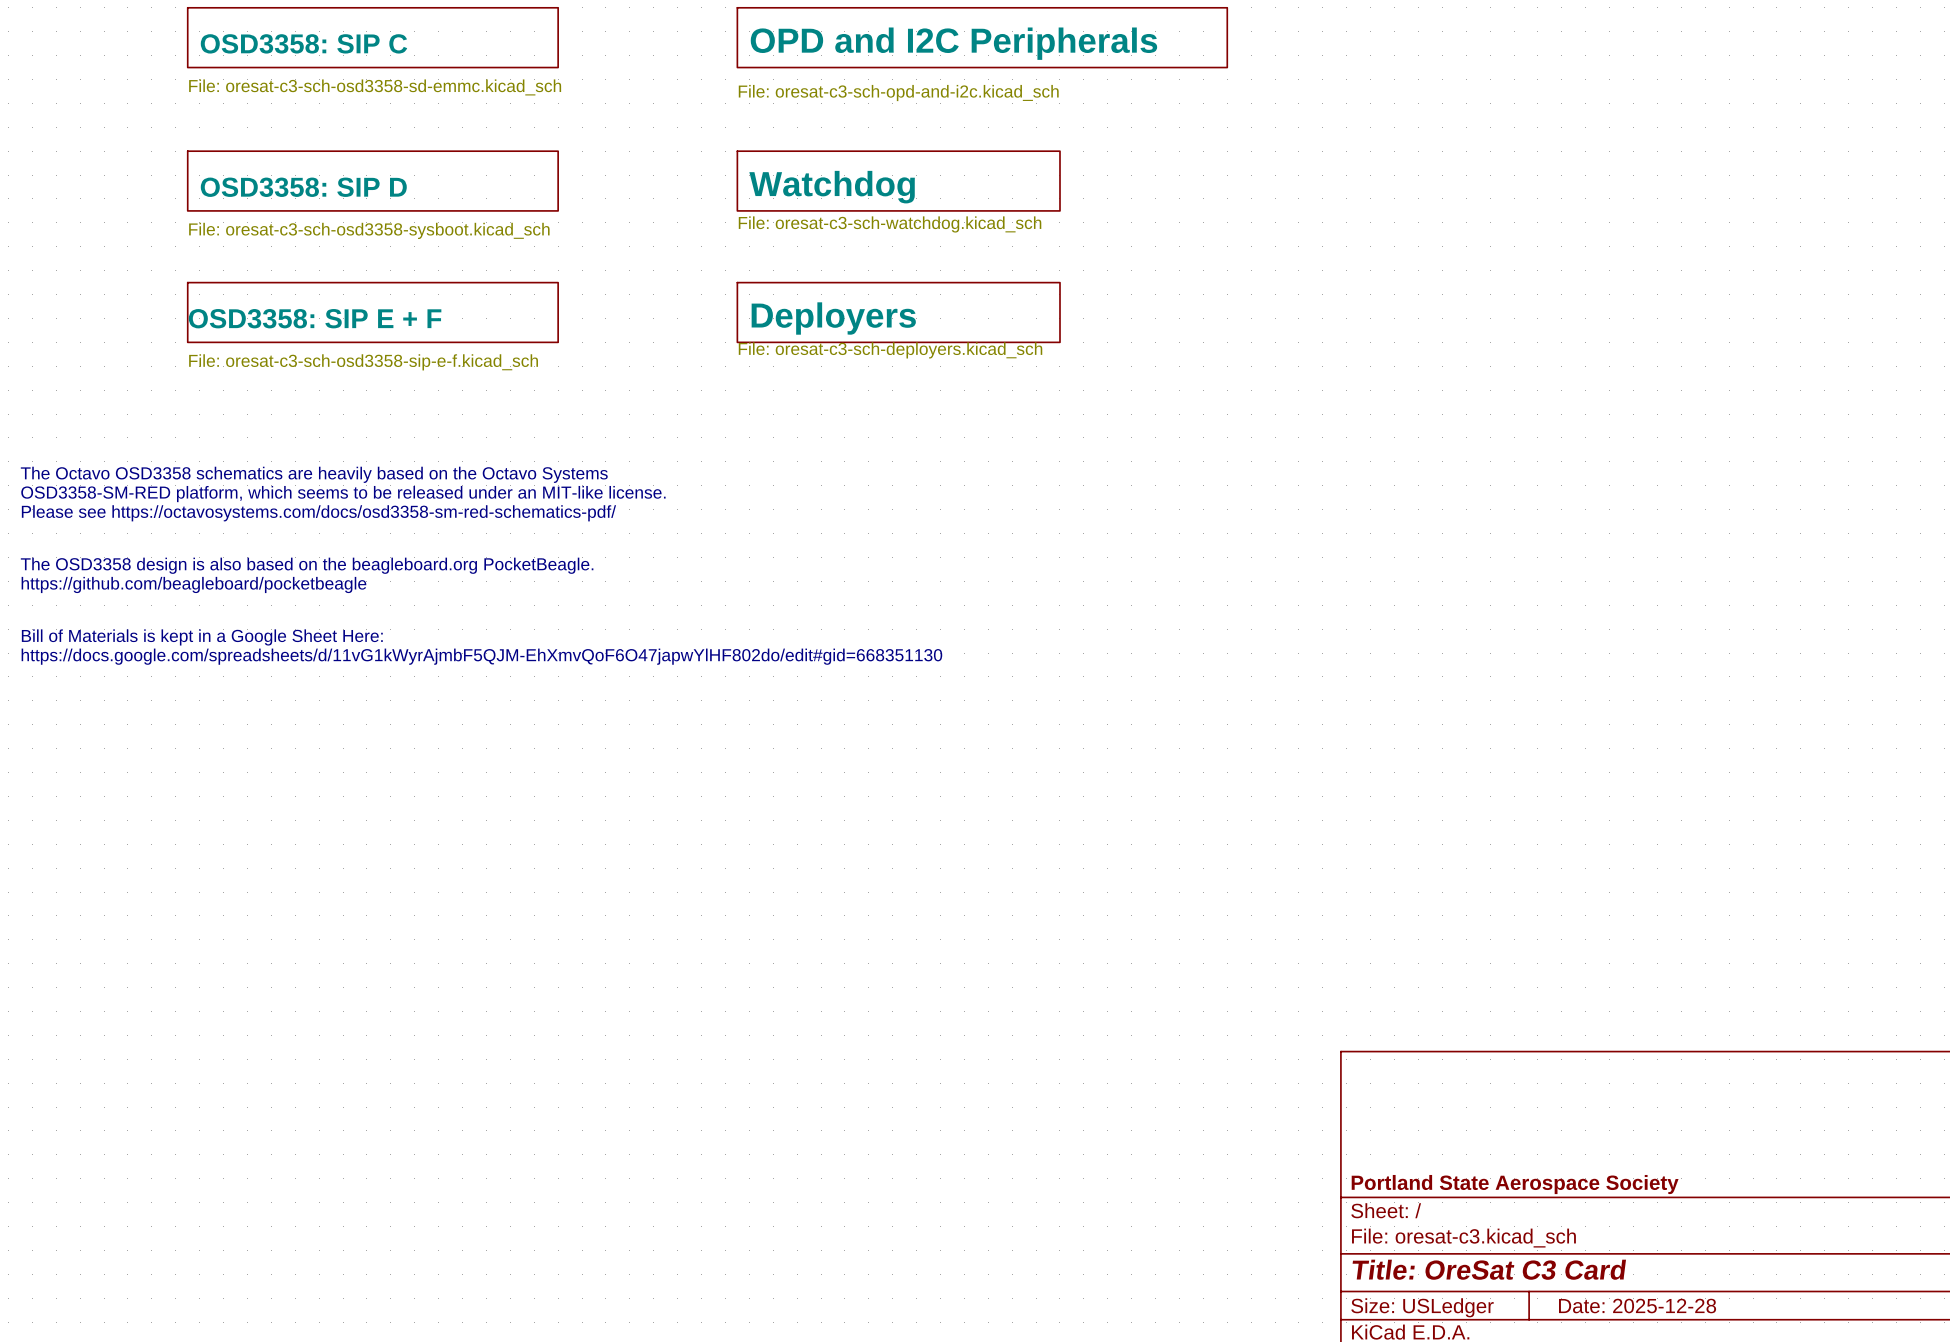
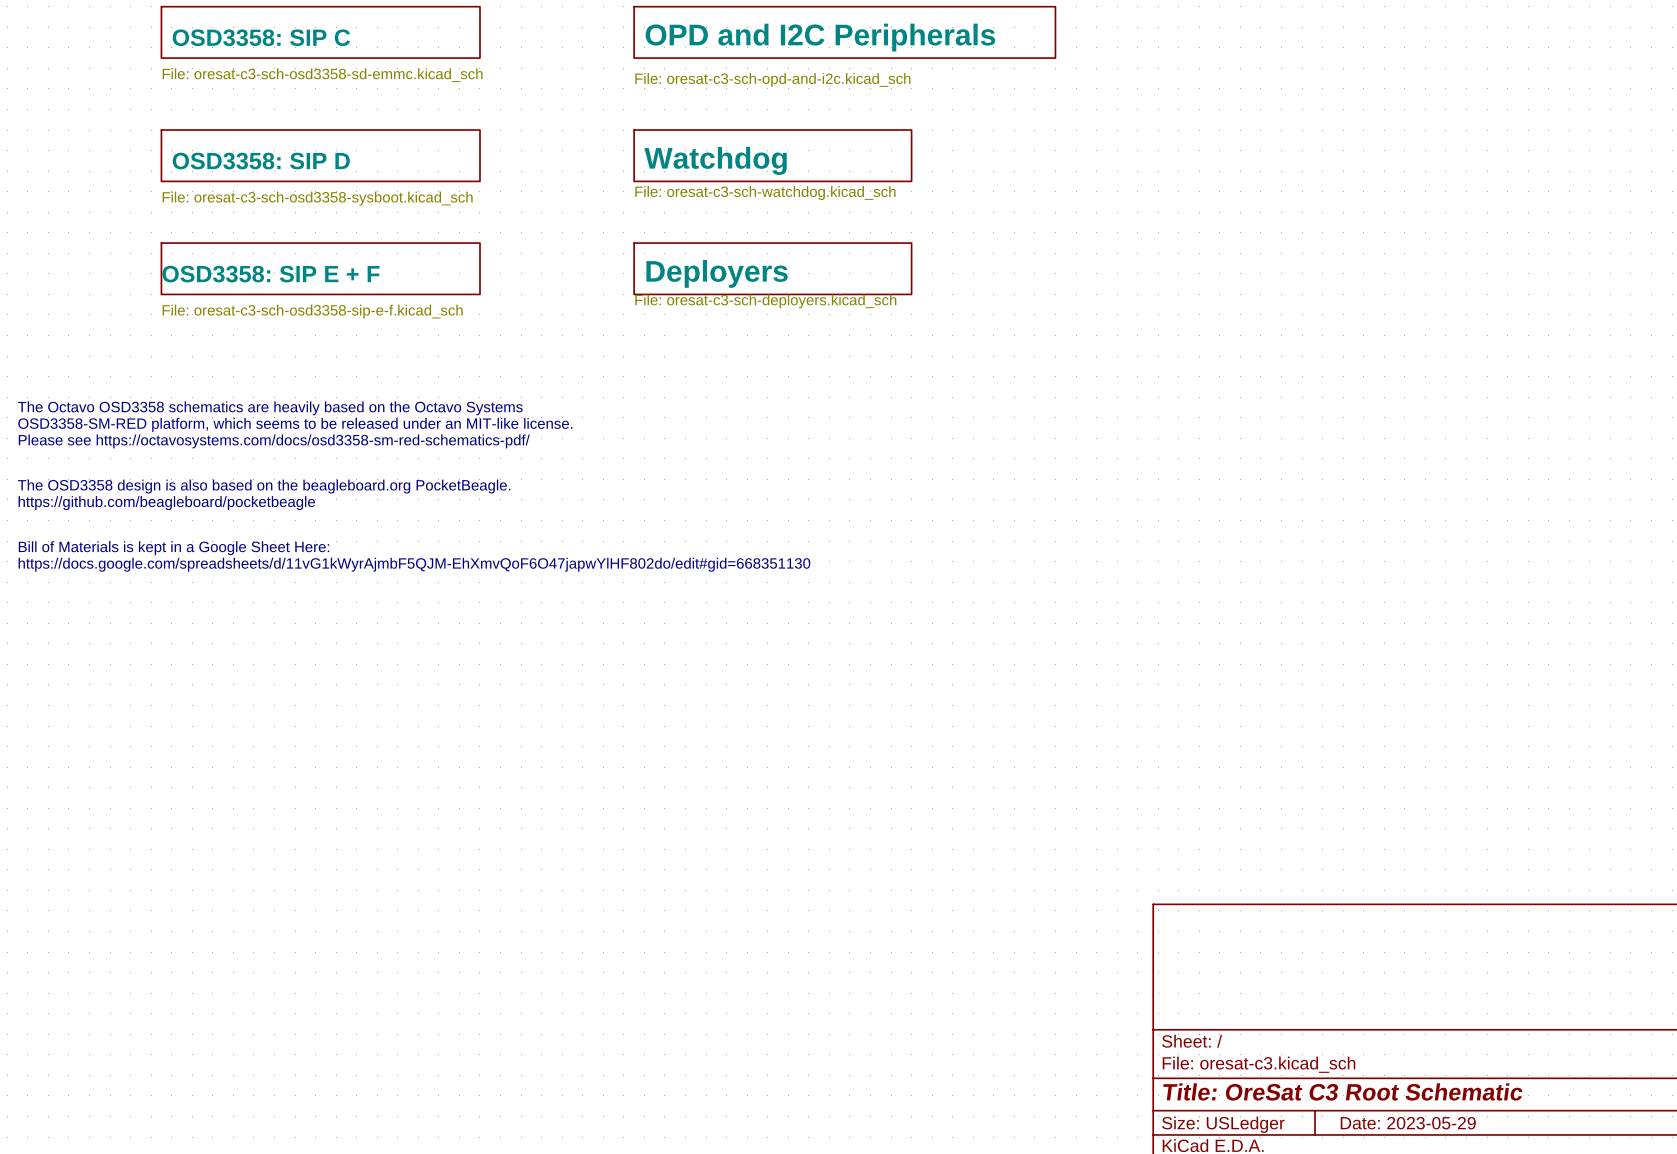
title block: Portland State Aerospace Society (1515, 1184) -> none
title block: Title: OreSat C3 Card (1489, 1269) -> Title: OreSat C3 Root Schematic (1342, 1091)
title block: Date: 2025-12-28 (1637, 1306) -> Date: 2023-05-29 (1408, 1123)

